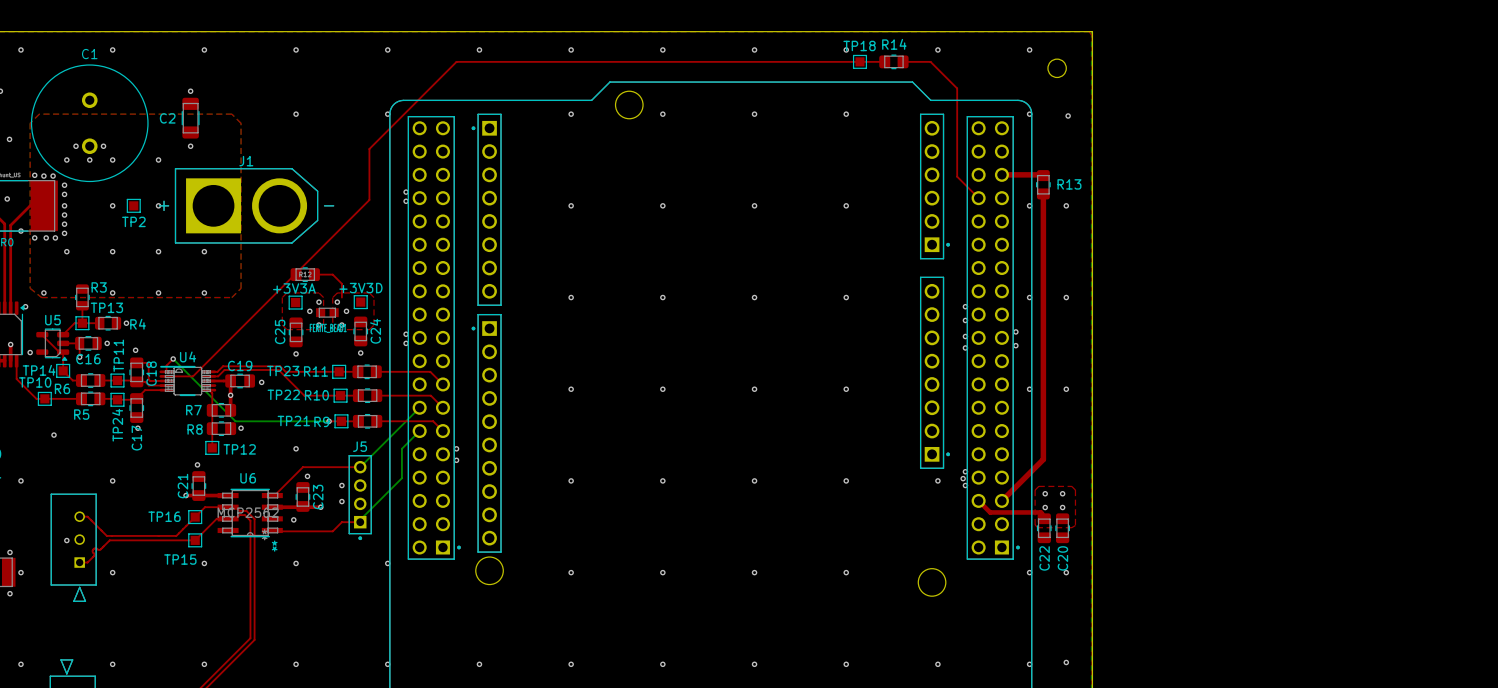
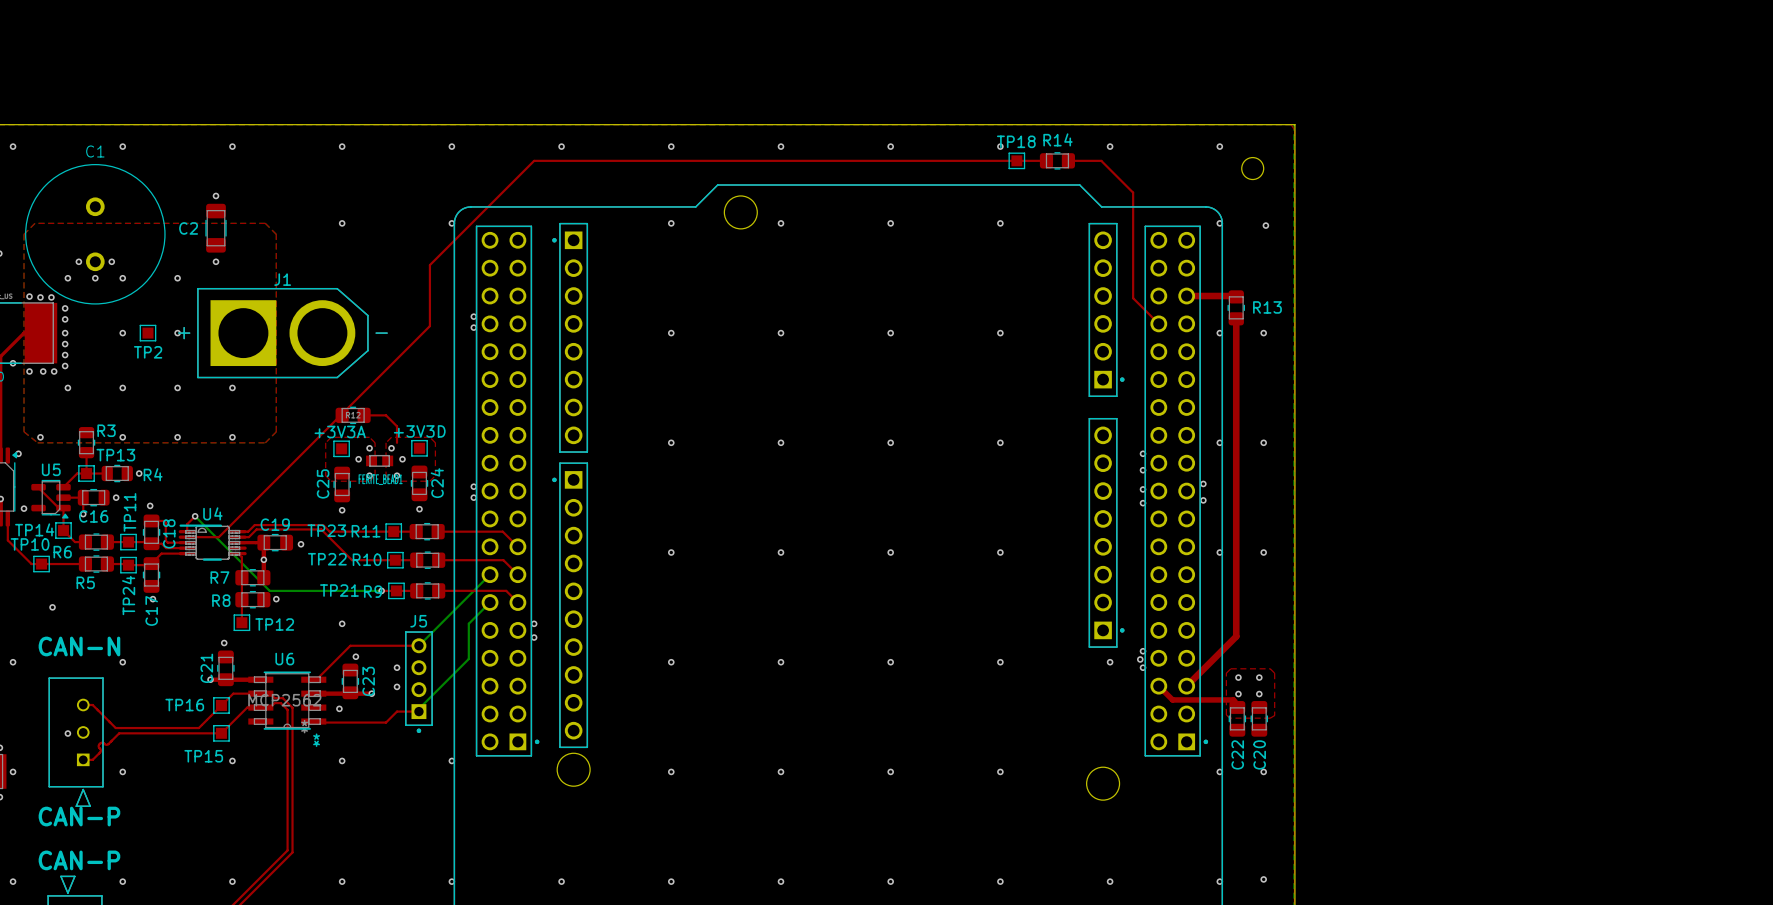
text: none -> CAN-N (79, 646)
text: none -> CAN-P (79, 816)
text: none -> CAN-P (79, 860)

